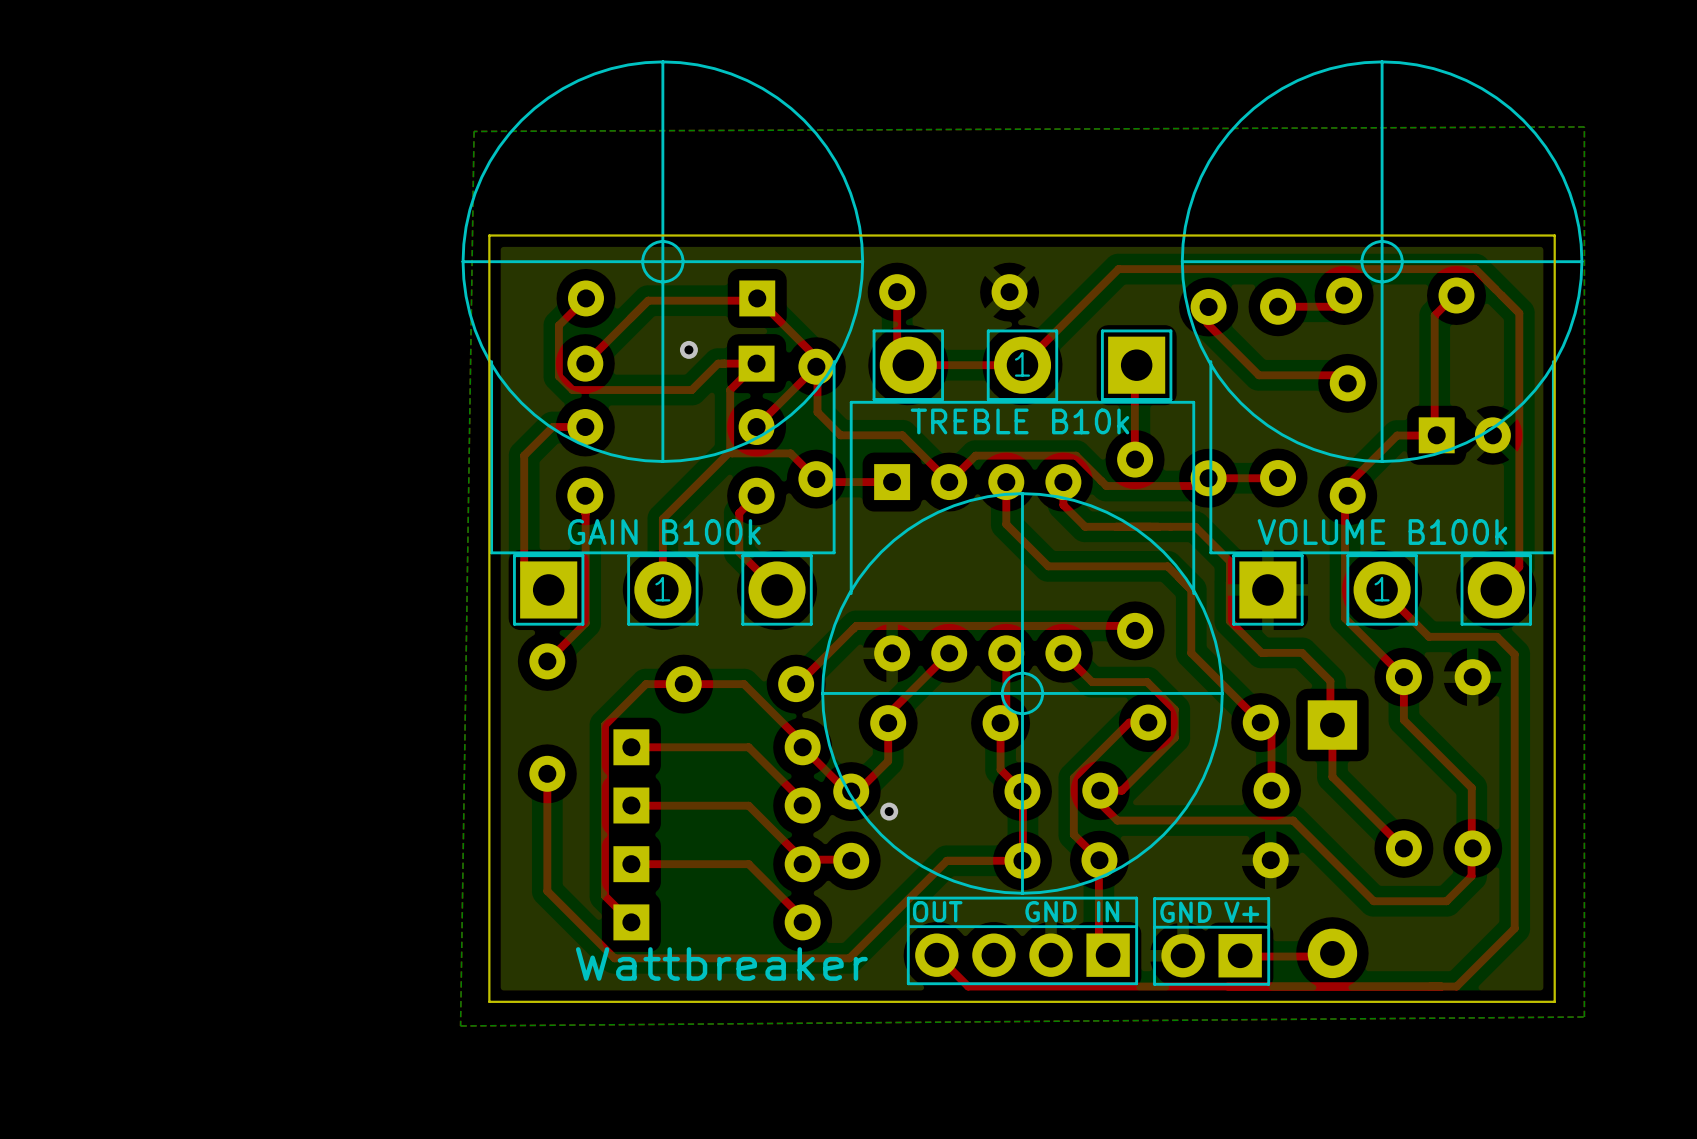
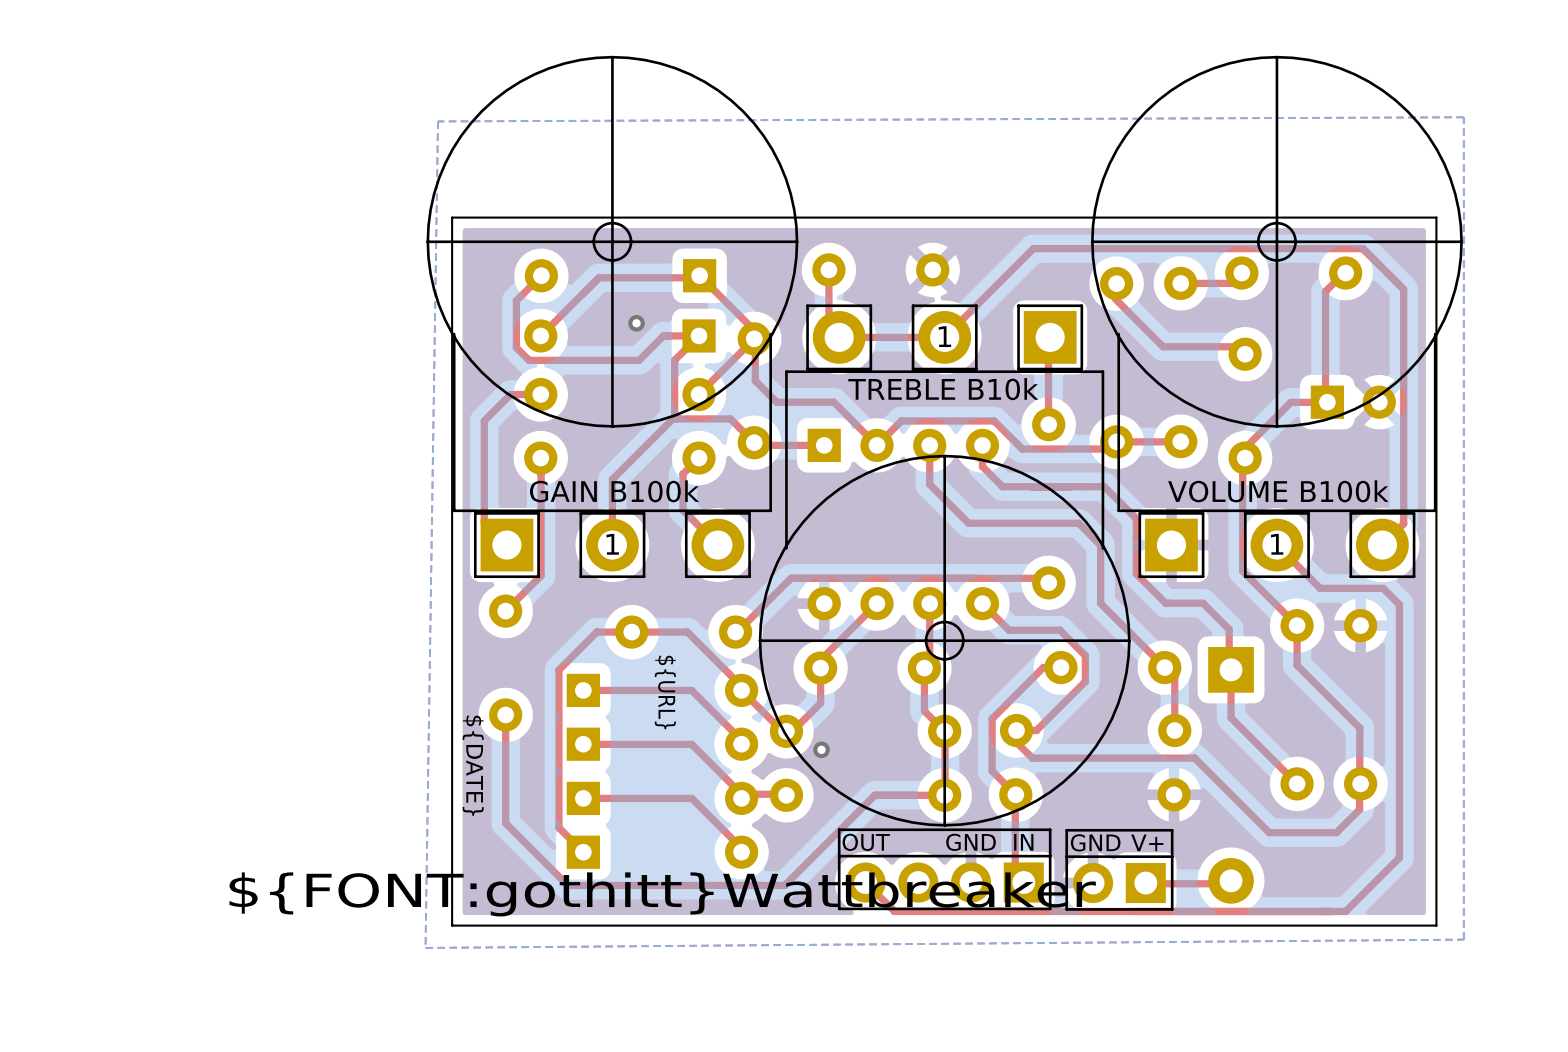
text: none -> ${URL} (665, 692)
text: none -> ${DATE} (473, 765)
text: Wattbreaker (721, 963) -> ${FONT:gothitt}Wattbreaker (662, 894)

